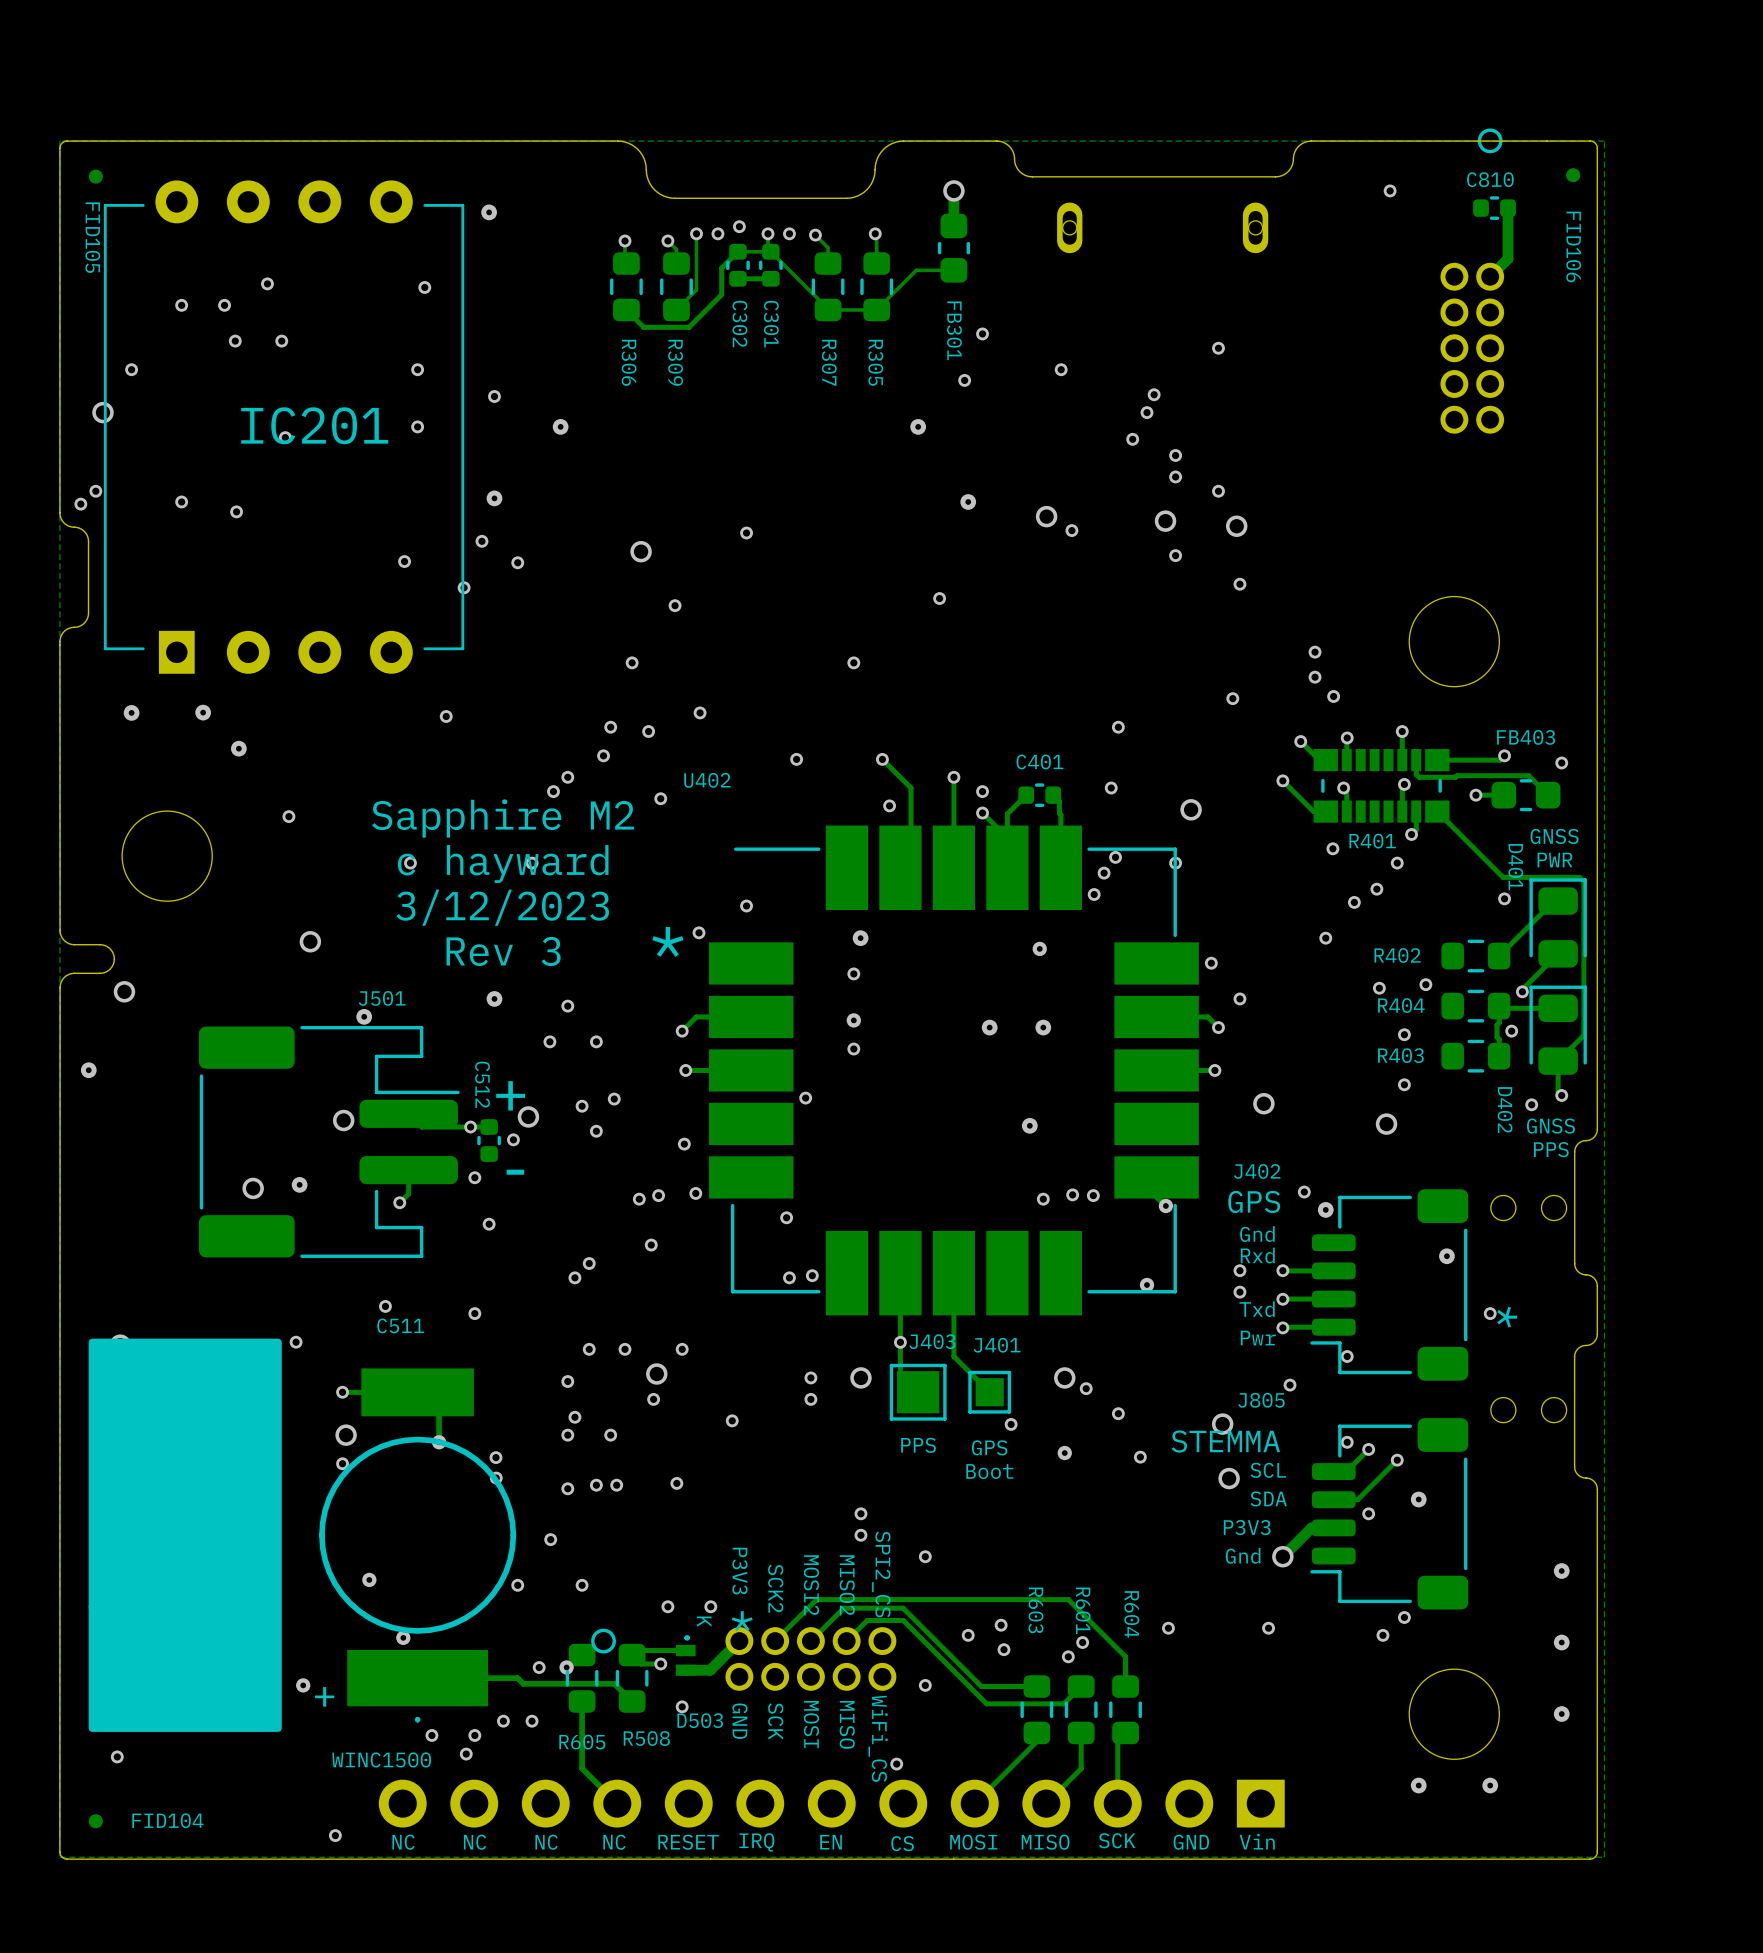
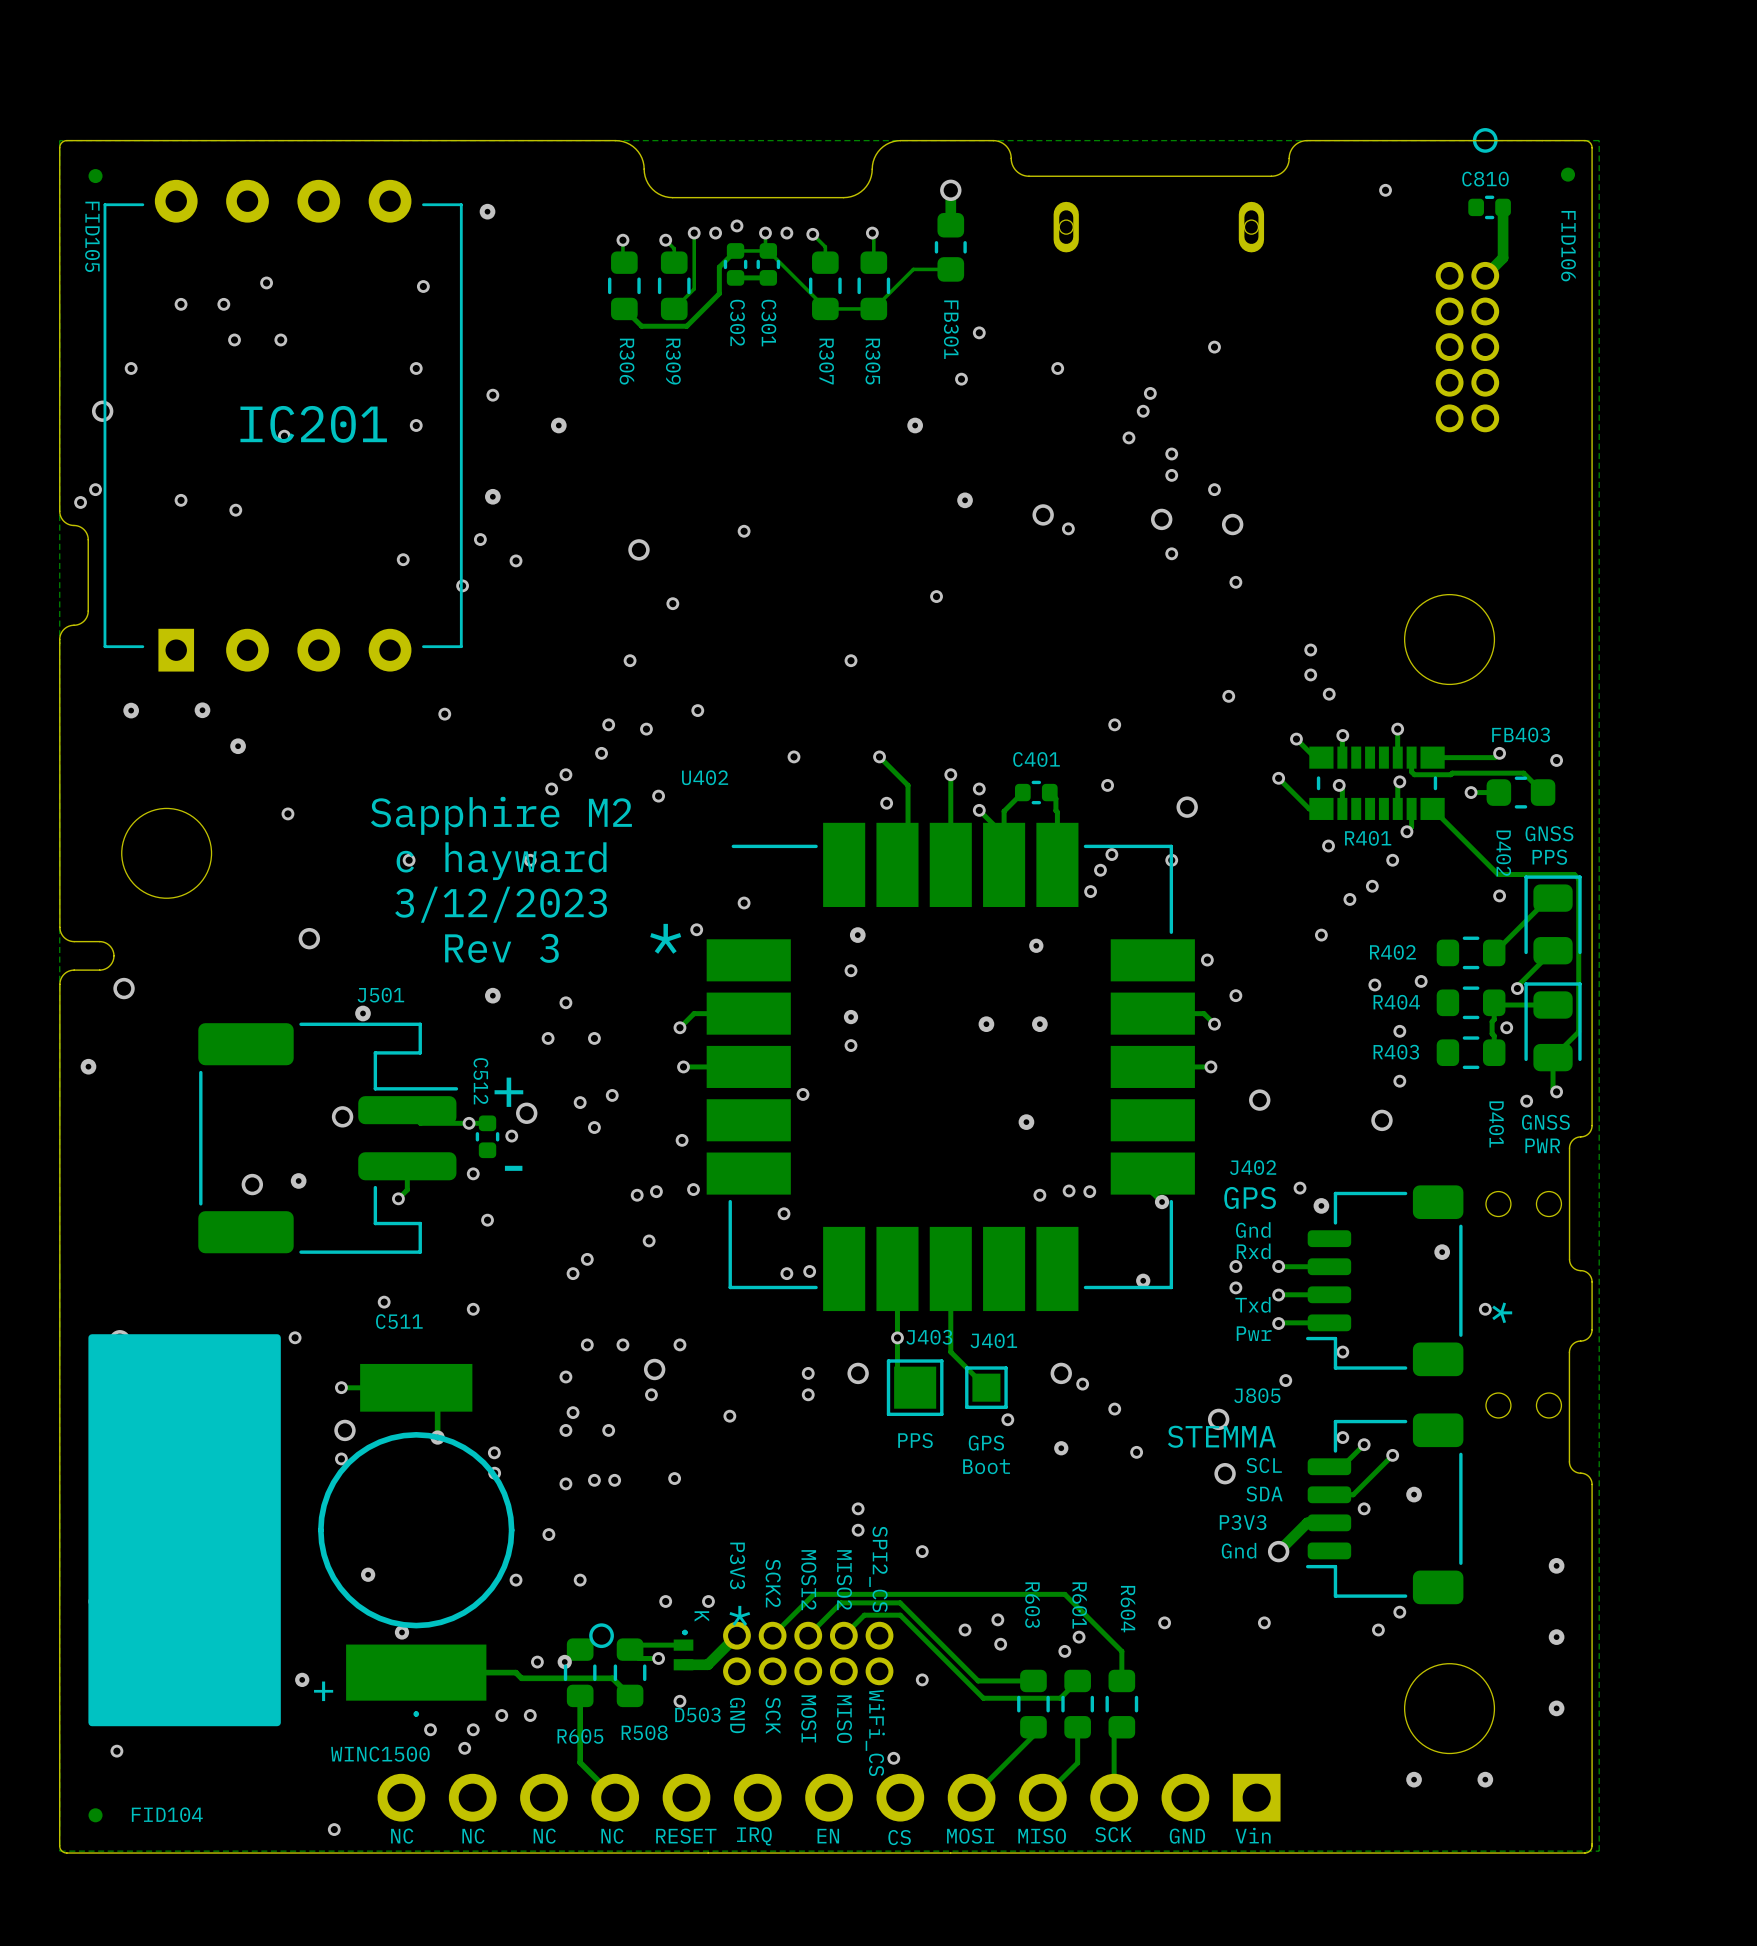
text: PWR (1554, 860) -> PPS (1549, 857)
D401 name position: D401 (1515, 867) -> D401 (1496, 1124)
D402 name position: D402 (1505, 1110) -> D402 (1503, 853)
text: PPS (1551, 1149) -> PWR (1542, 1145)

